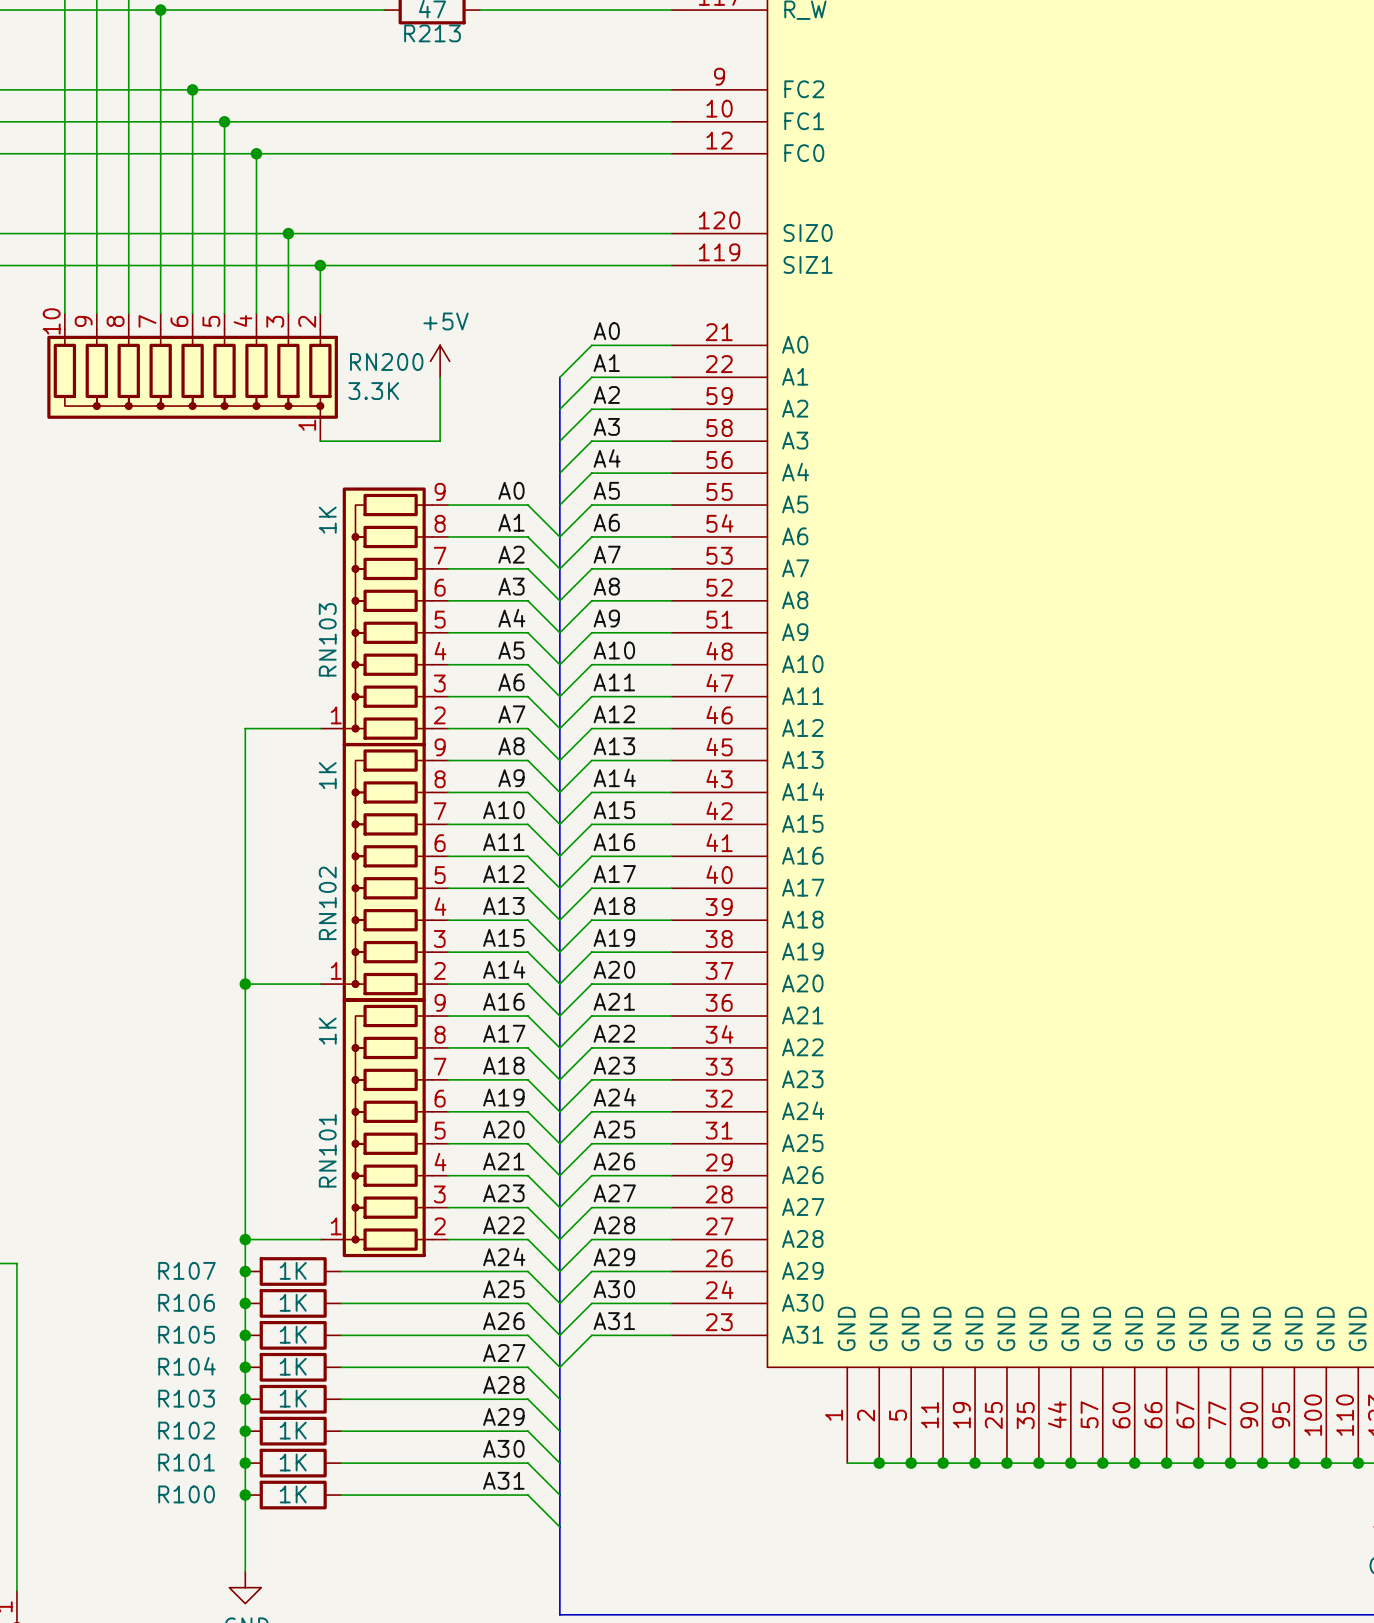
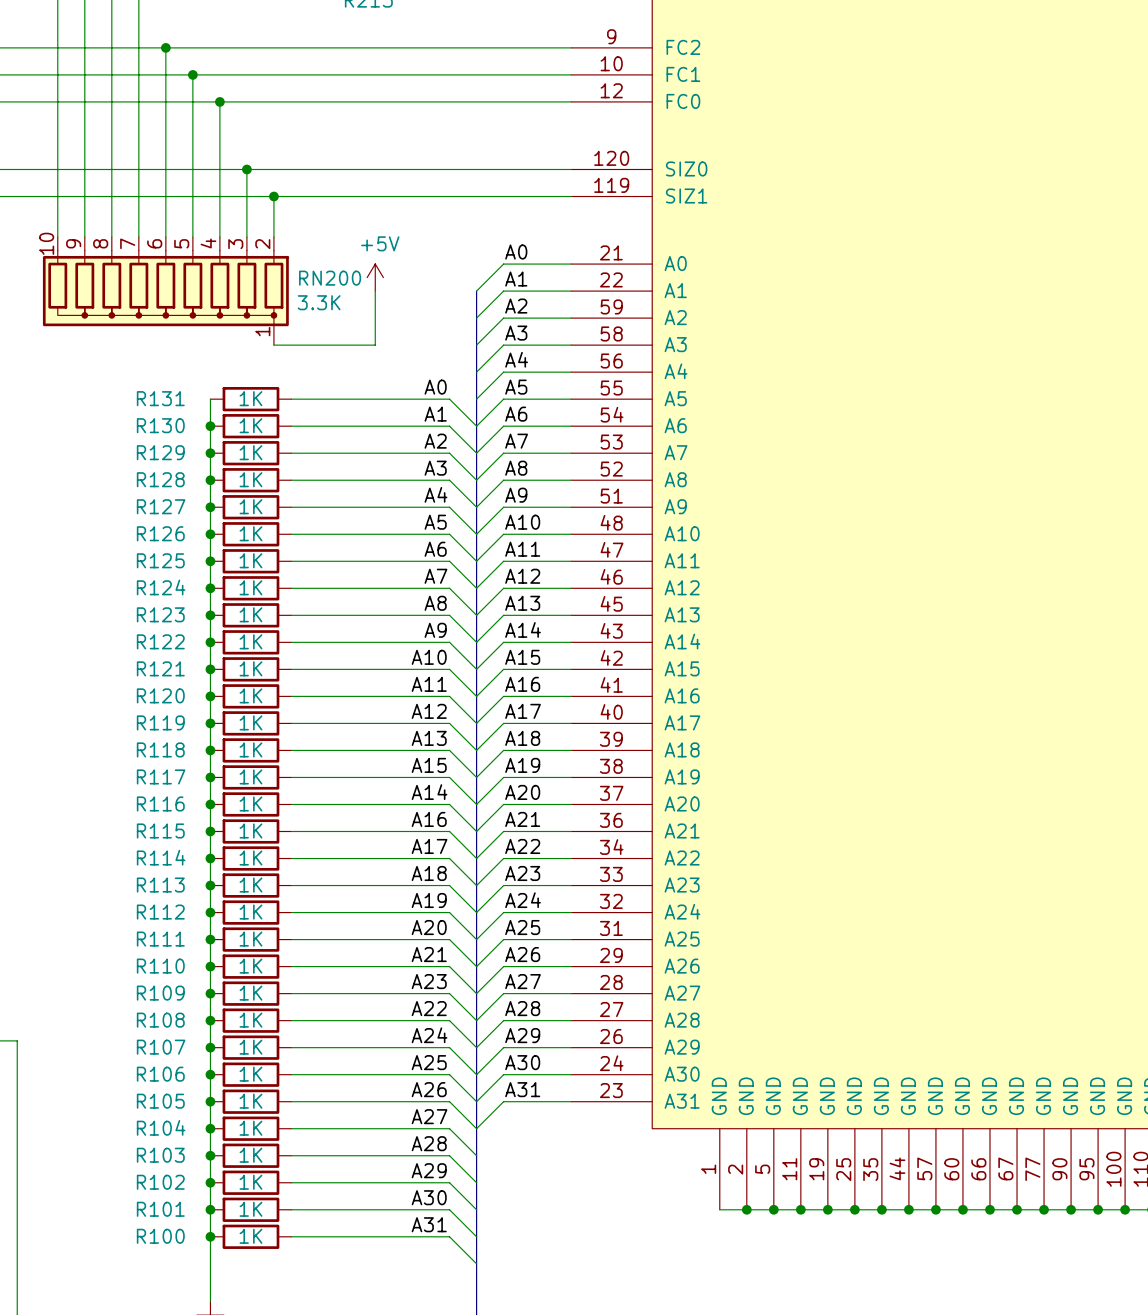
R131: none -> 1K (250, 399)
junction: none -> (210, 426)
R130: none -> 1K (250, 426)
junction: none -> (210, 453)
R129: none -> 1K (250, 453)
junction: none -> (210, 480)
R128: none -> 1K (250, 480)
RN103: 1K (384, 616) -> none
junction: none -> (210, 507)
R127: none -> 1K (250, 507)
junction: none -> (210, 534)
R126: none -> 1K (250, 534)
junction: none -> (210, 561)
R125: none -> 1K (250, 561)
wire: (245, 728) (320, 728) -> (210, 588) (210, 399)
junction: none -> (210, 588)
R124: none -> 1K (250, 588)
junction: none -> (210, 615)
R123: none -> 1K (250, 615)
junction: none -> (210, 642)
R122: none -> 1K (250, 642)
junction: none -> (210, 669)
R121: none -> 1K (250, 669)
junction: none -> (210, 696)
R120: none -> 1K (250, 696)
RN102: 1K (384, 872) -> none
junction: none -> (210, 723)
R119: none -> 1K (250, 723)
junction: none -> (210, 750)
R118: none -> 1K (250, 750)
junction: none -> (210, 777)
R117: none -> 1K (250, 777)
wire: (245, 984) (320, 984) -> none
R116: none -> 1K (250, 804)
junction: none -> (210, 831)
R115: none -> 1K (250, 831)
junction: none -> (210, 858)
R114: none -> 1K (250, 858)
junction: none -> (210, 885)
R113: none -> 1K (250, 885)
junction: none -> (210, 912)
R112: none -> 1K (250, 912)
RN101: 1K (384, 1127) -> none
junction: none -> (210, 939)
R111: none -> 1K (250, 939)
junction: none -> (210, 966)
R110: none -> 1K (250, 966)
junction: none -> (210, 993)
R109: none -> 1K (250, 993)
wire: (245, 1239) (320, 1239) -> none
R108: none -> 1K (250, 1020)

